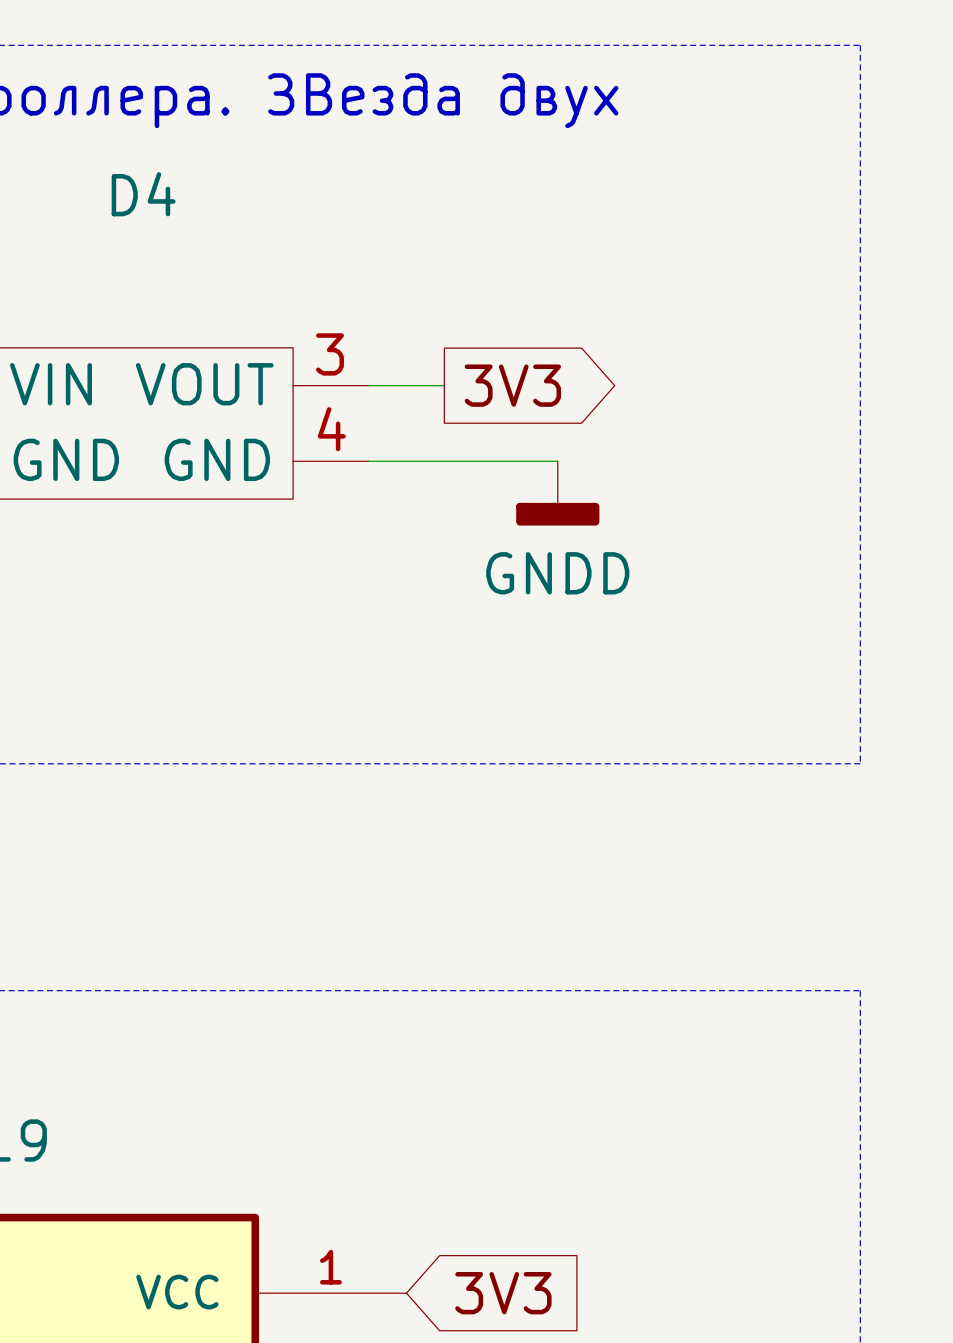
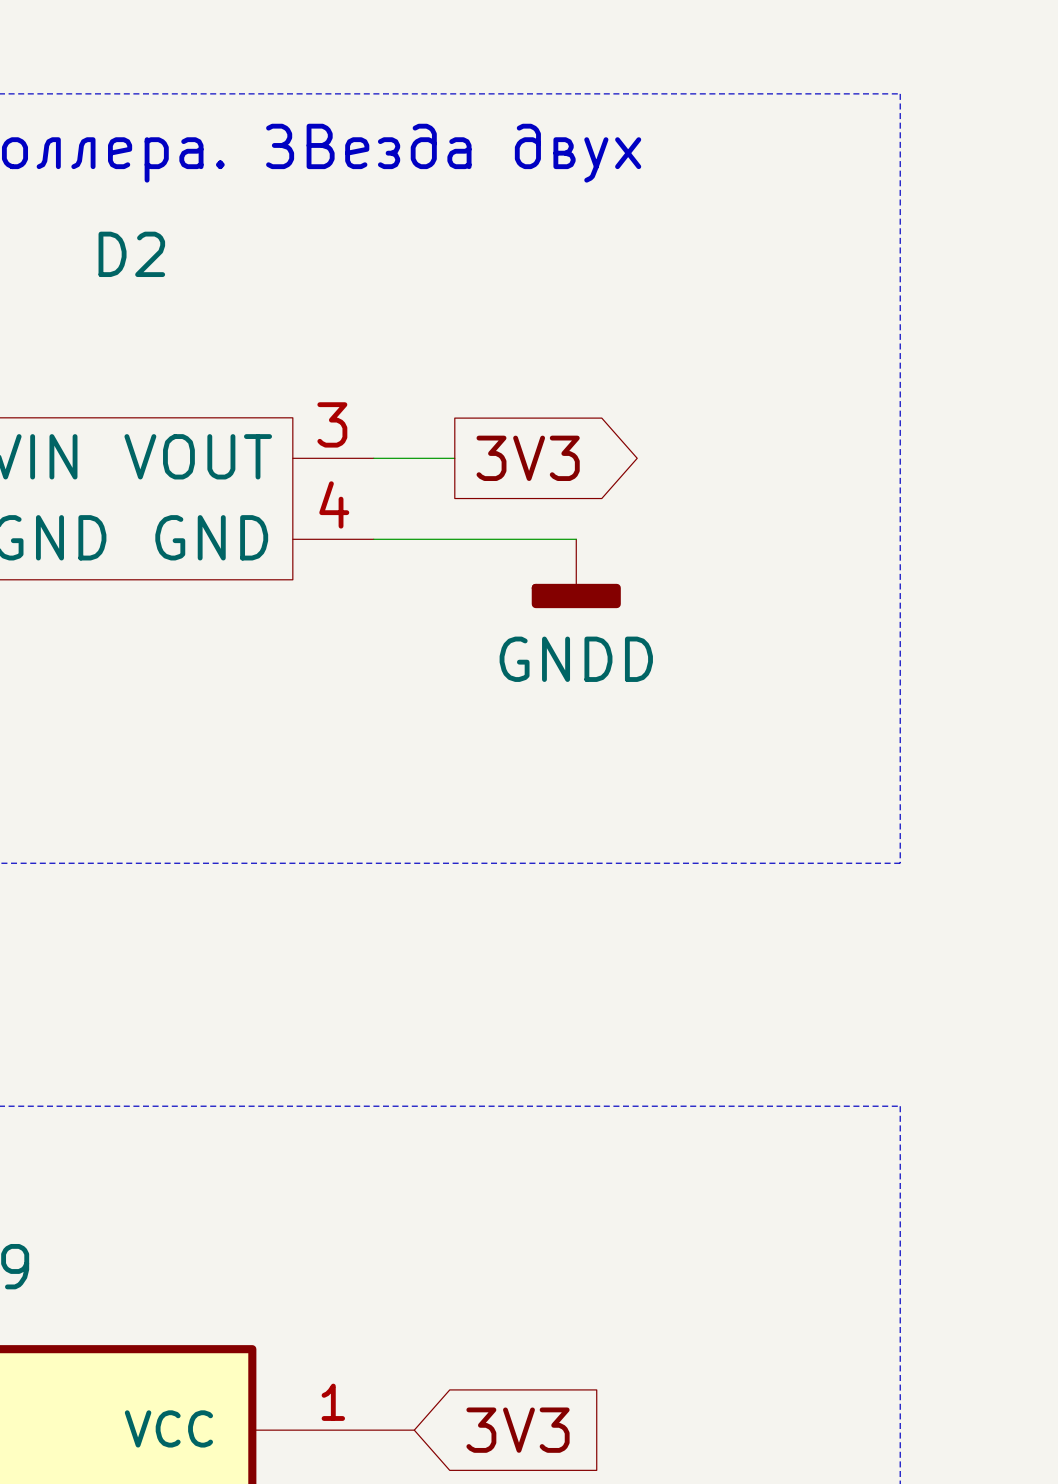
D4 name: D4 (143, 194) -> D2 (131, 254)

